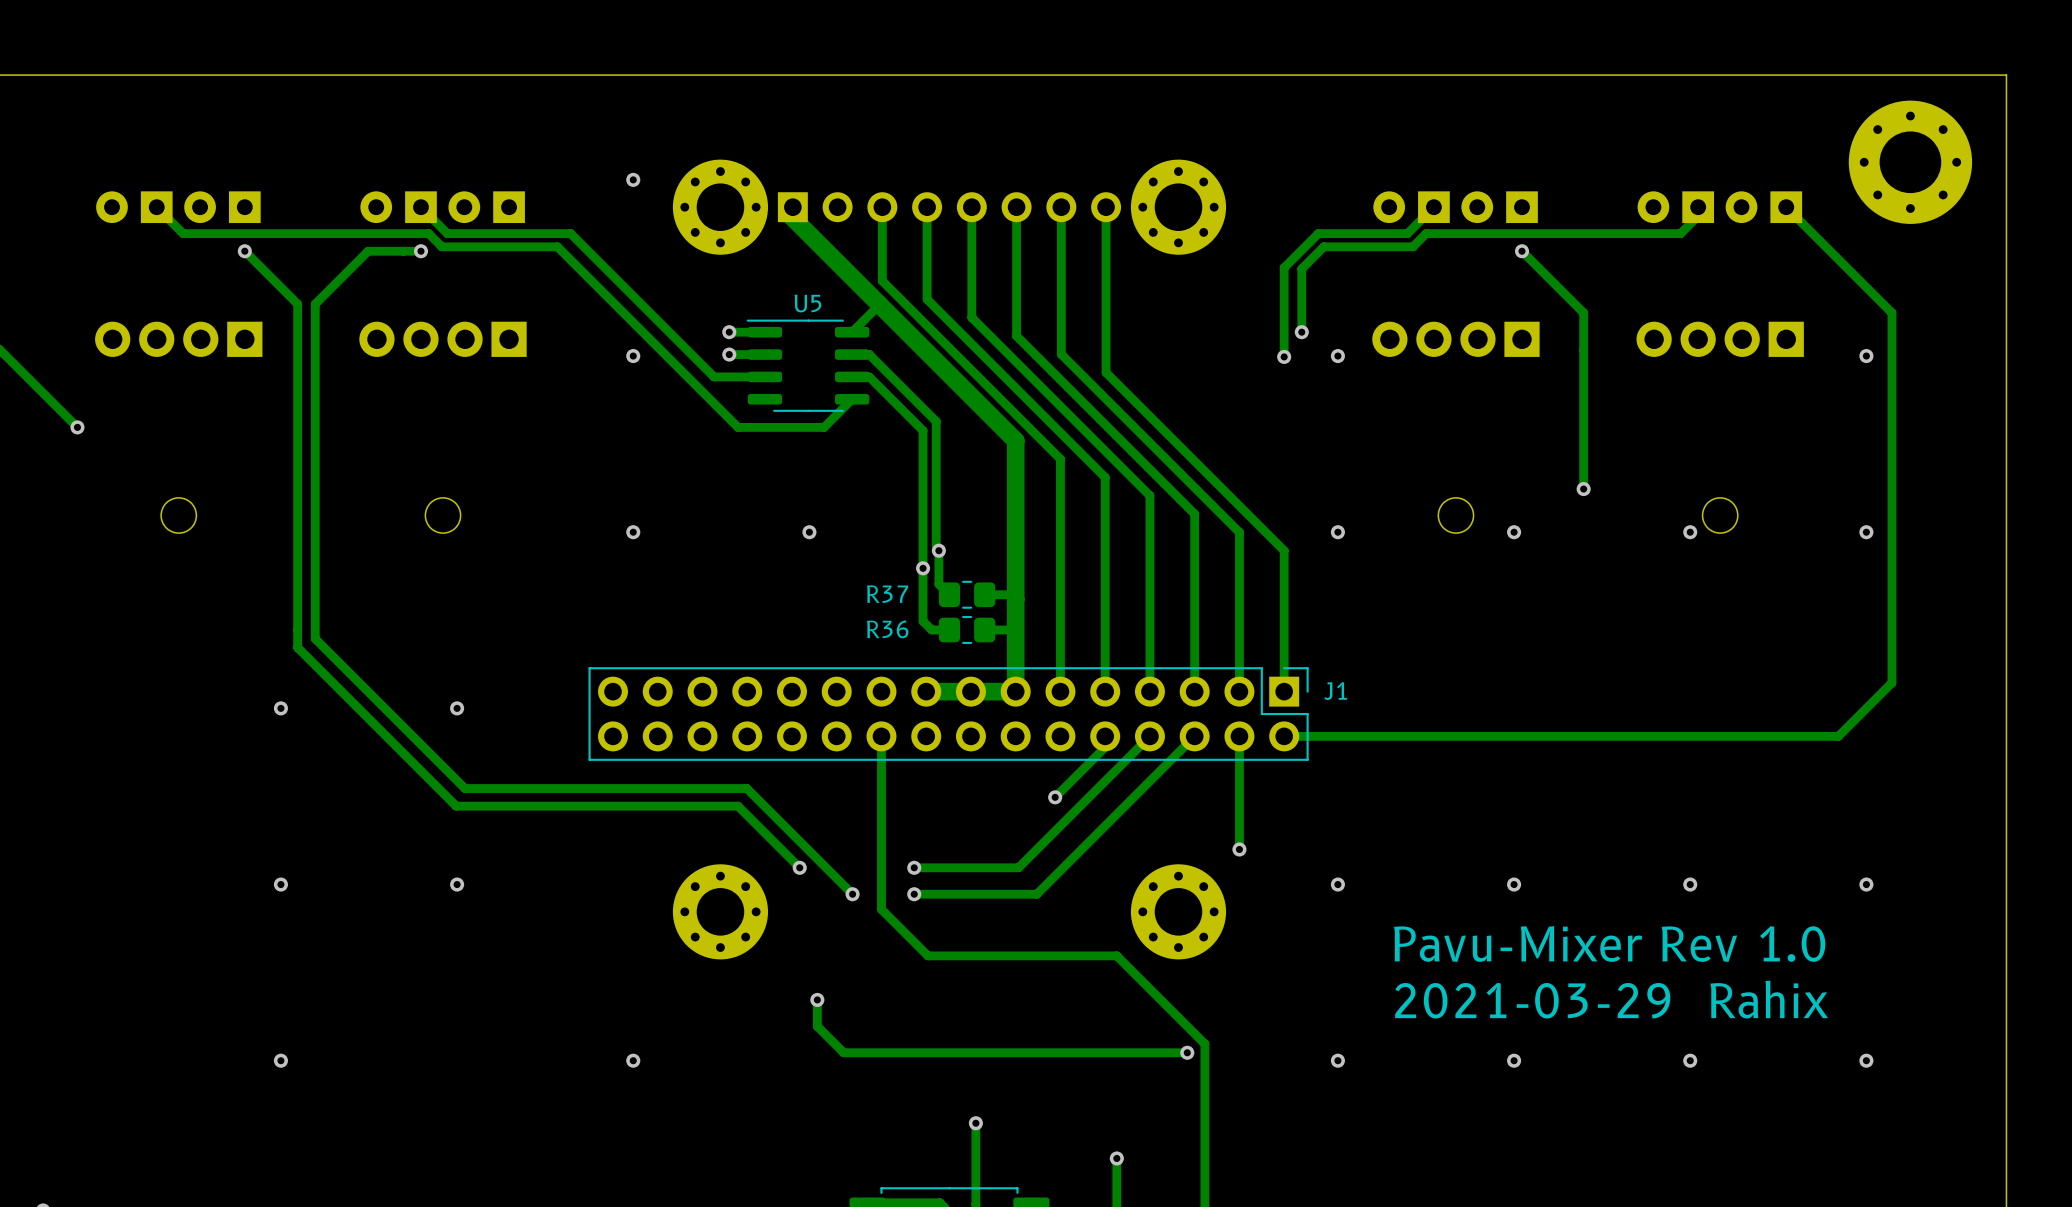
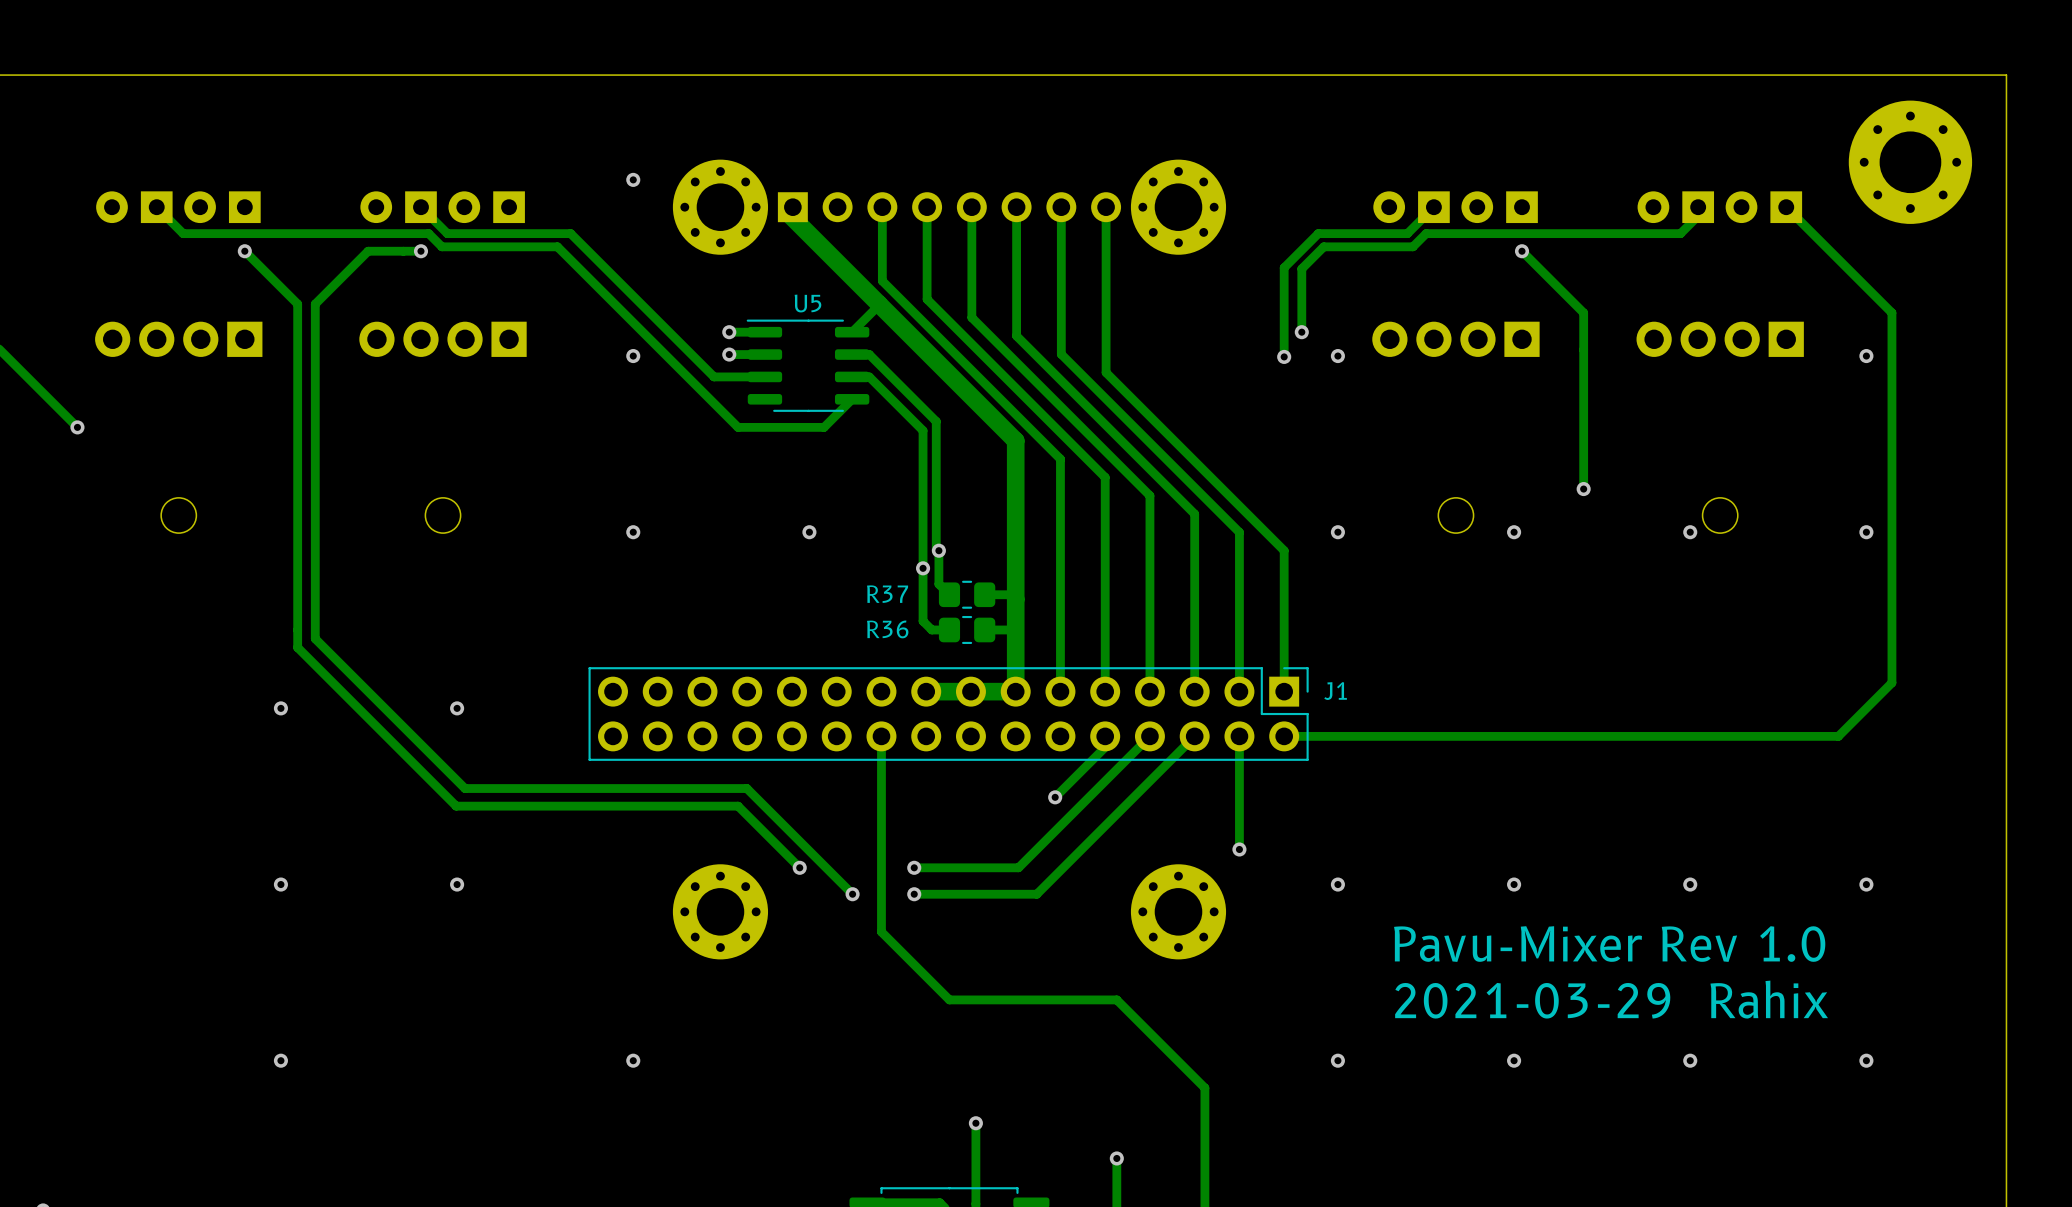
track: (881, 909) (927, 955) (1116, 955) (1204, 1043) (1204, 1088) -> (881, 909) (881, 931) (949, 999) (1116, 999) (1204, 1088)
track: (817, 999) (817, 1026) (843, 1052) (1187, 1052) -> none
via: (817, 999) -> none
via: (1187, 1052) -> none

